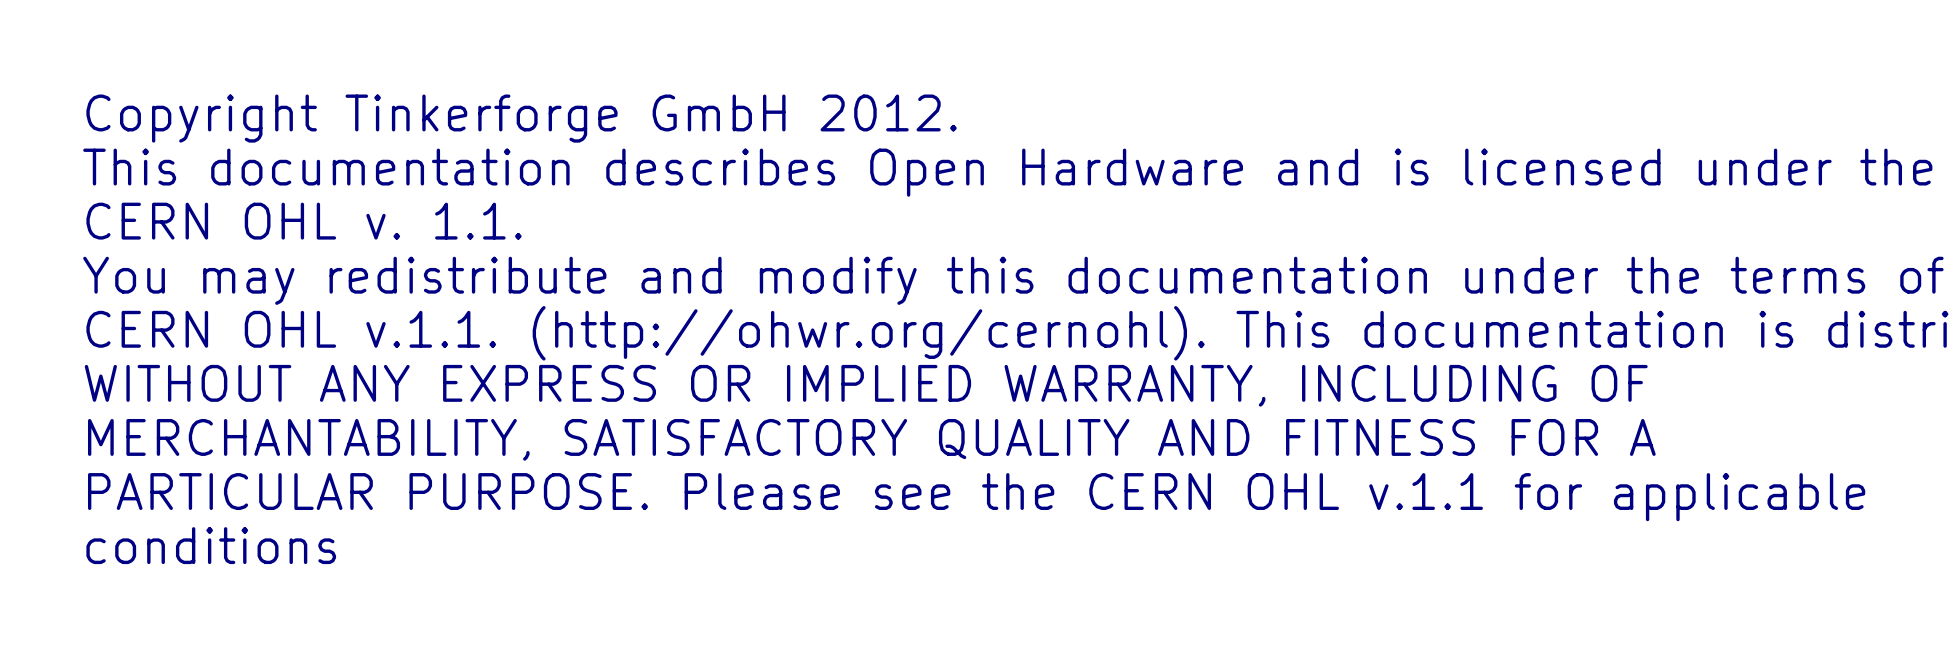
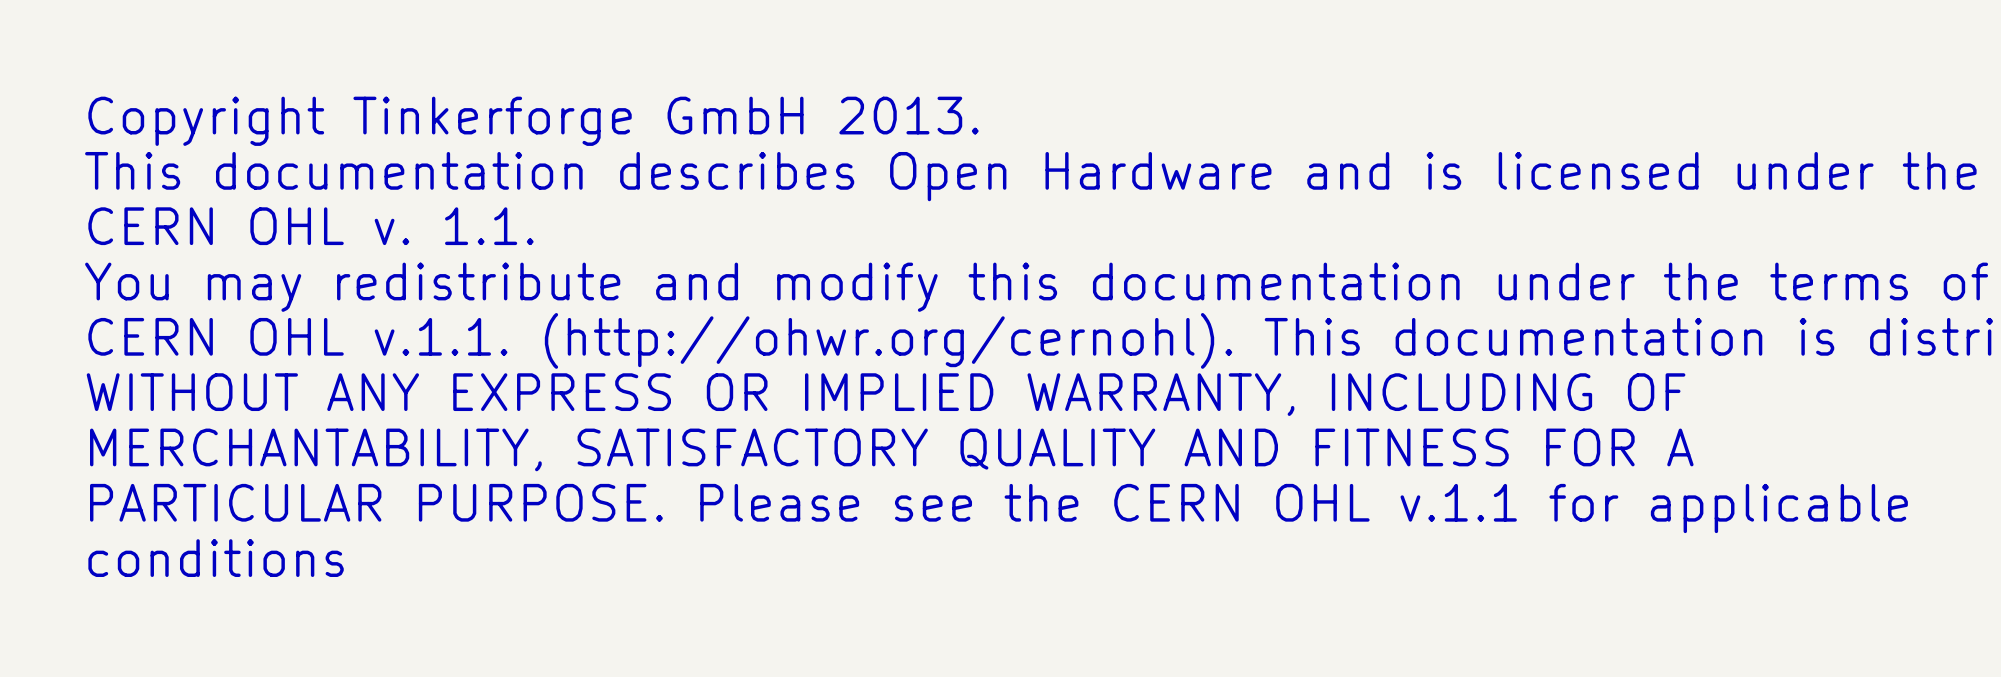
text: Copyright Tinkerforge GmbH 2012. (521, 118) -> Copyright Tinkerforge GmbH 2013. (533, 121)

